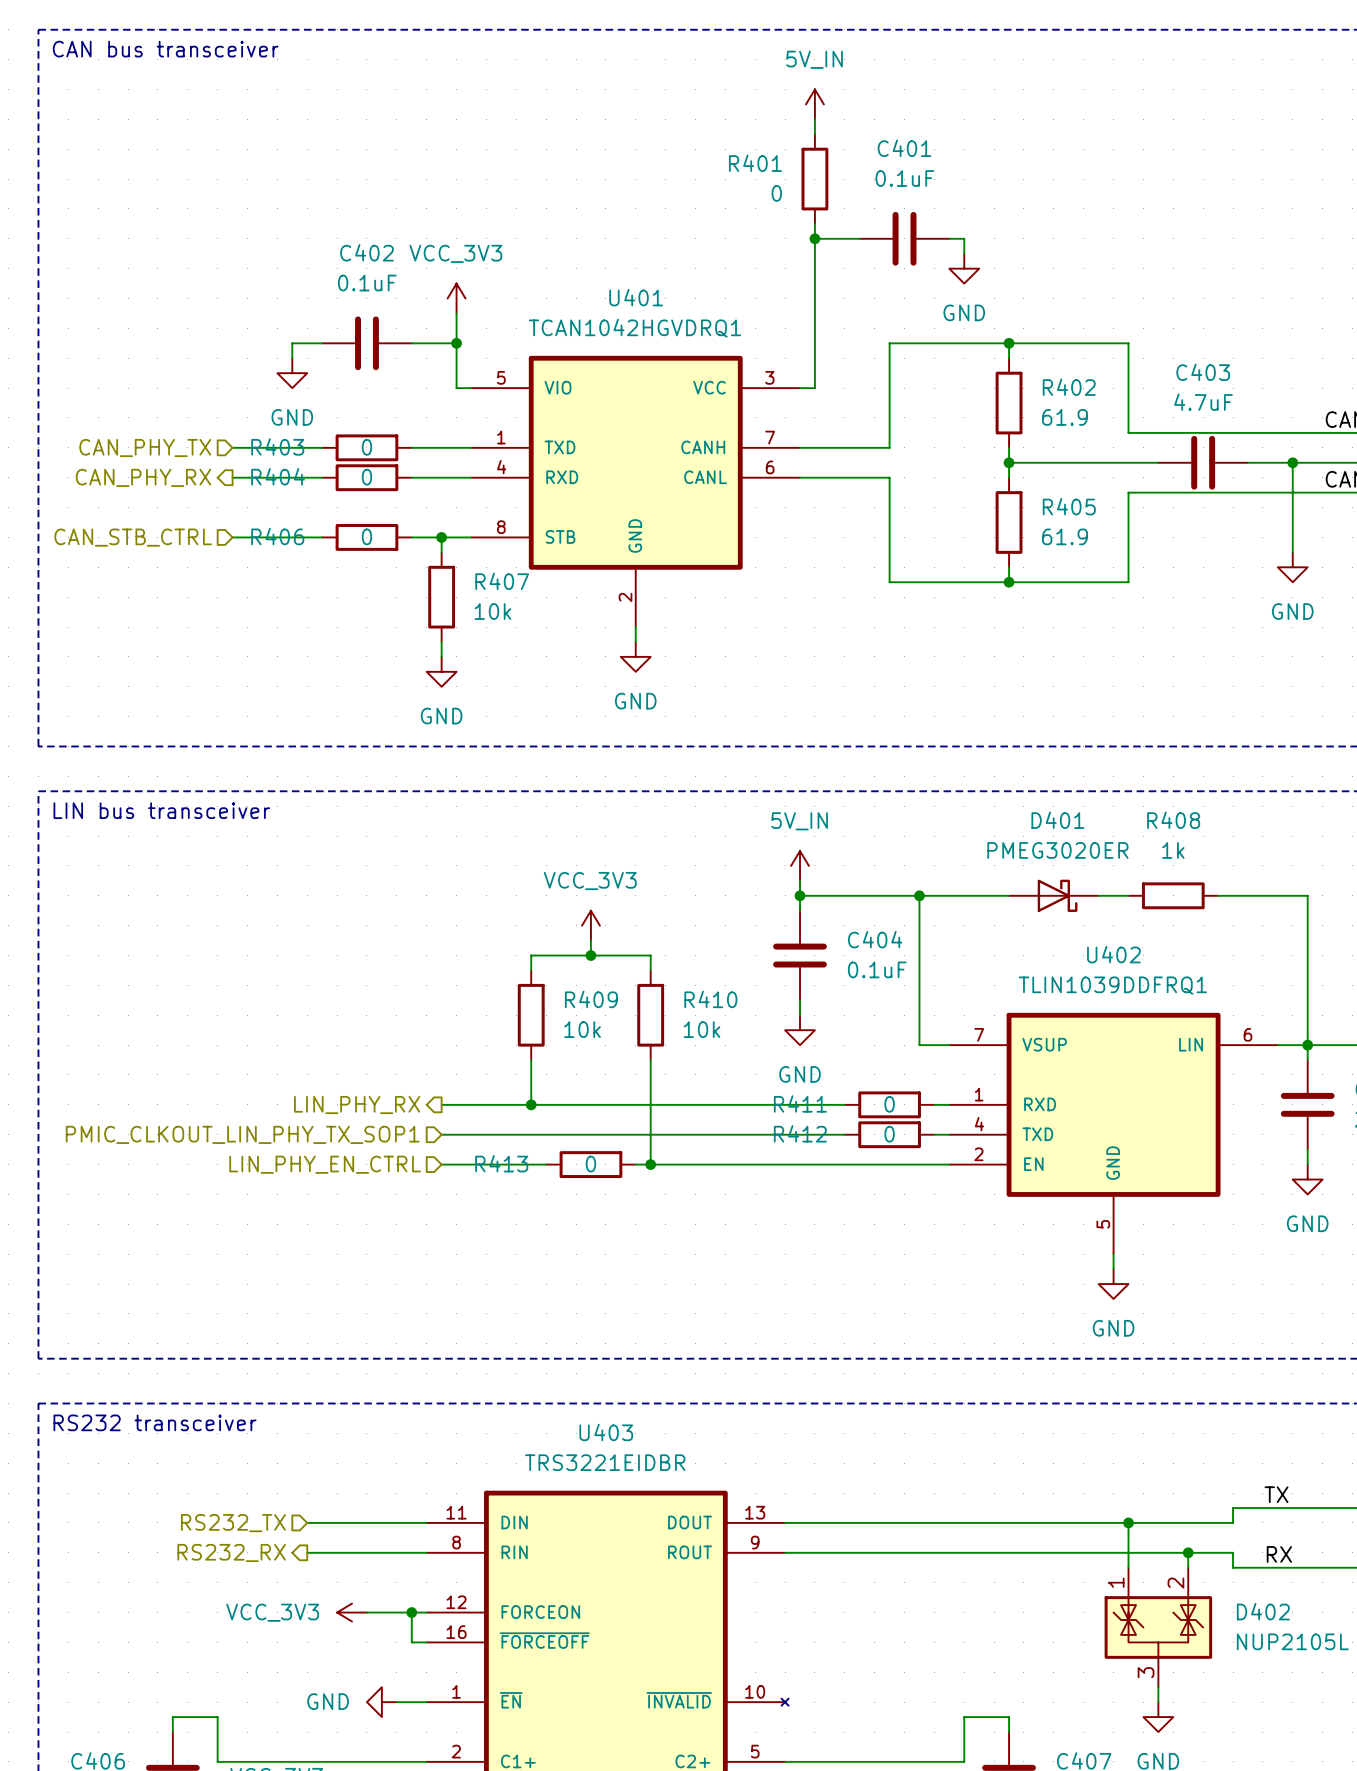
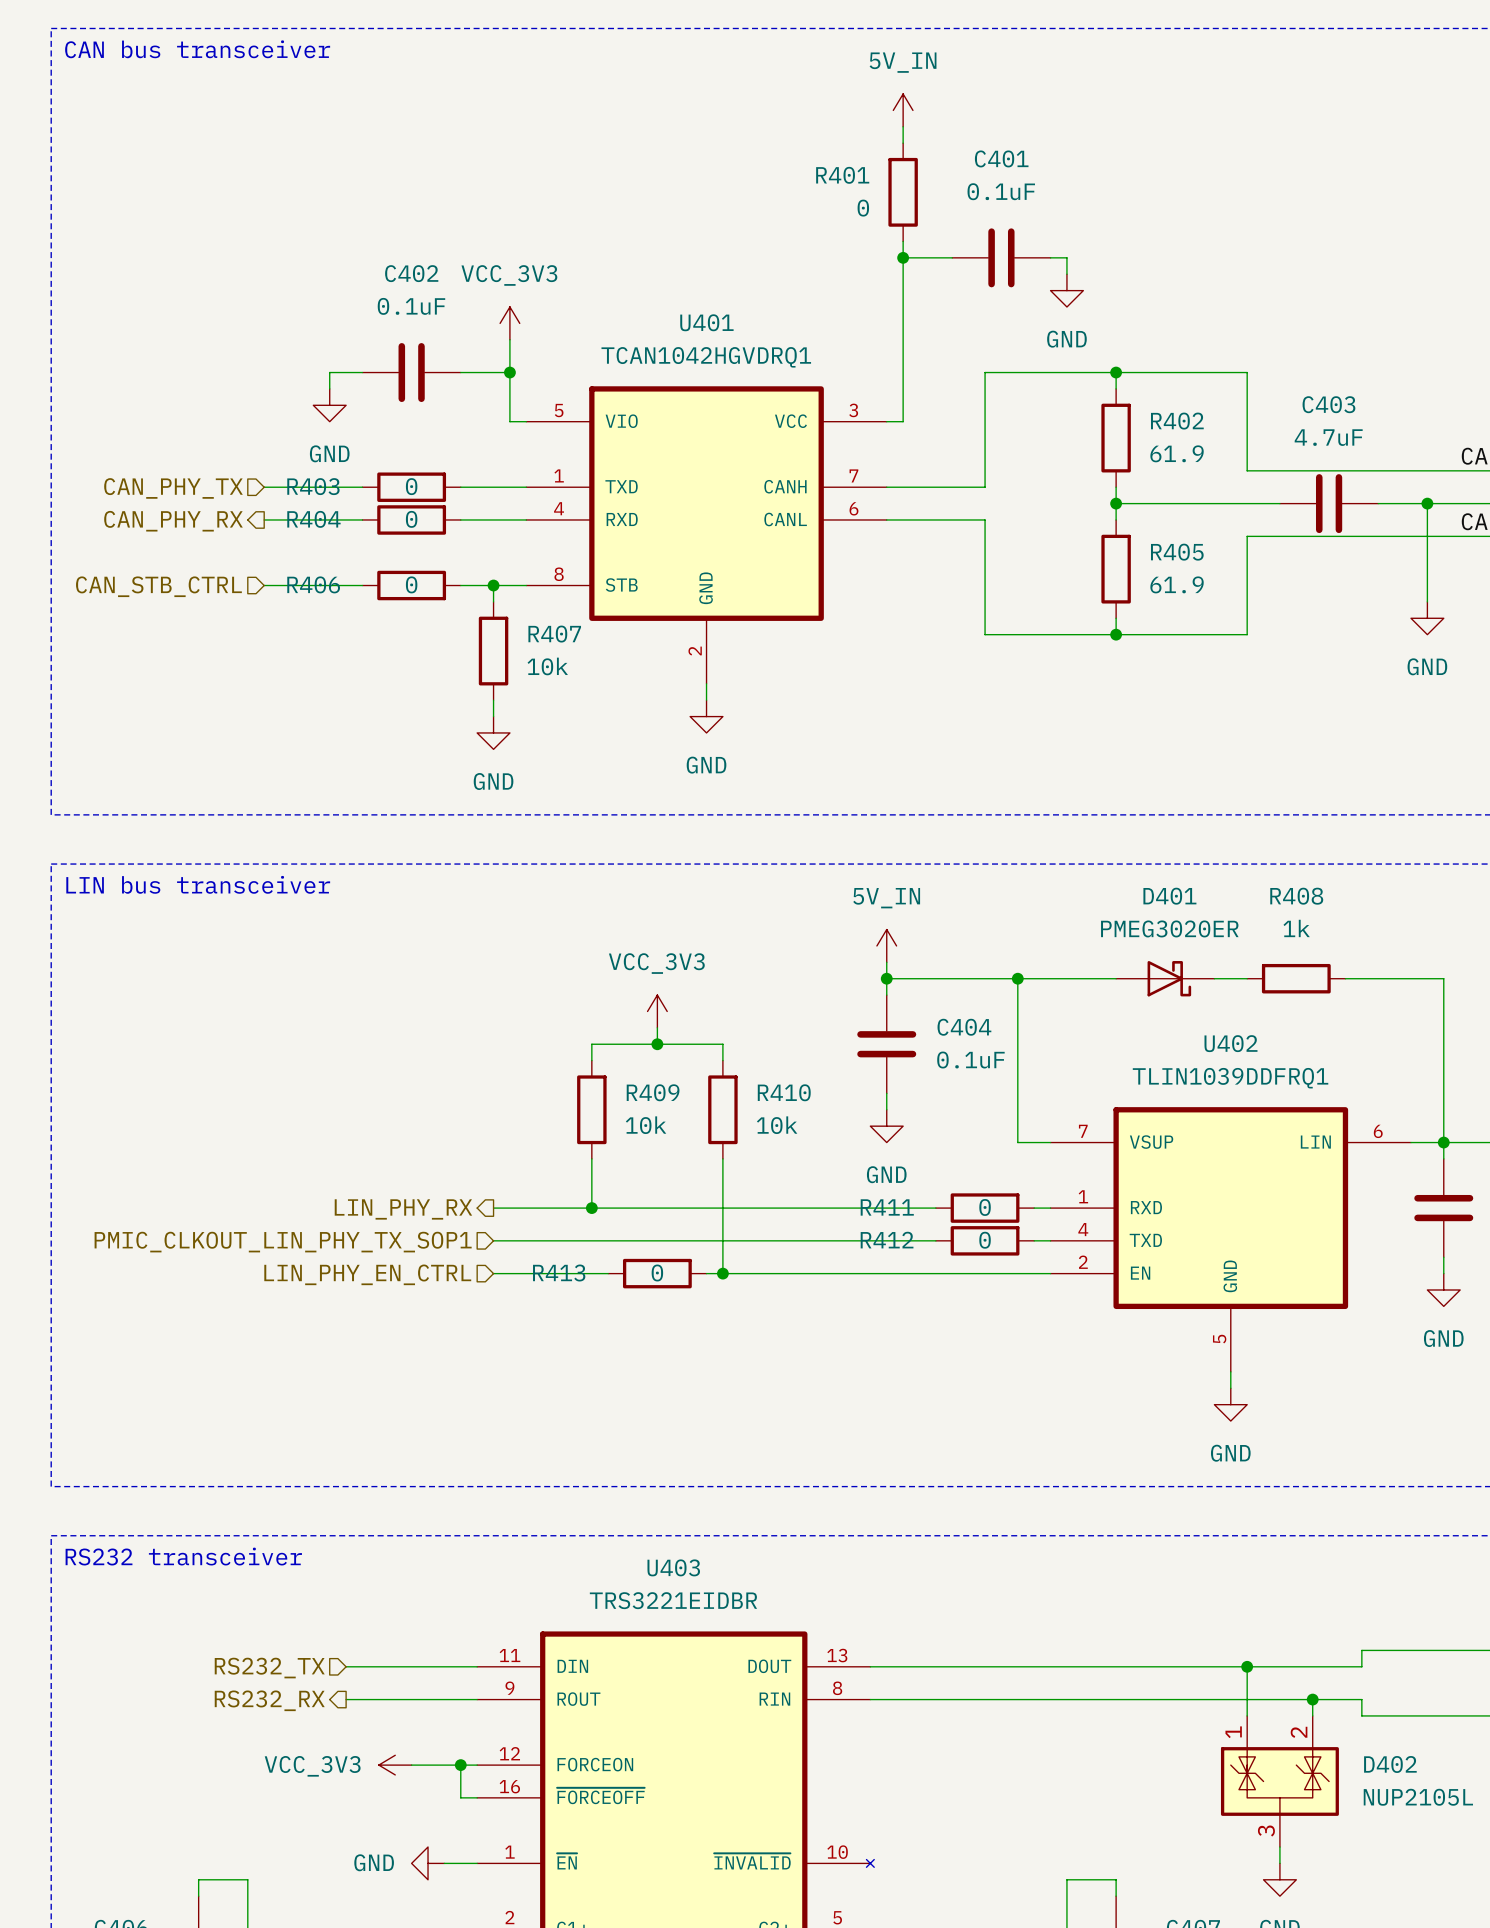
label: TX (1276, 1494) -> none
U403 pin number: 8 (456, 1542) -> 9 (509, 1688)
U403 pin number: 9 (755, 1542) -> 8 (837, 1688)
U403 pin name: RIN (514, 1552) -> ROUT (578, 1699)
U403 pin name: ROUT (690, 1552) -> RIN (774, 1699)
label: RX (1279, 1554) -> none

